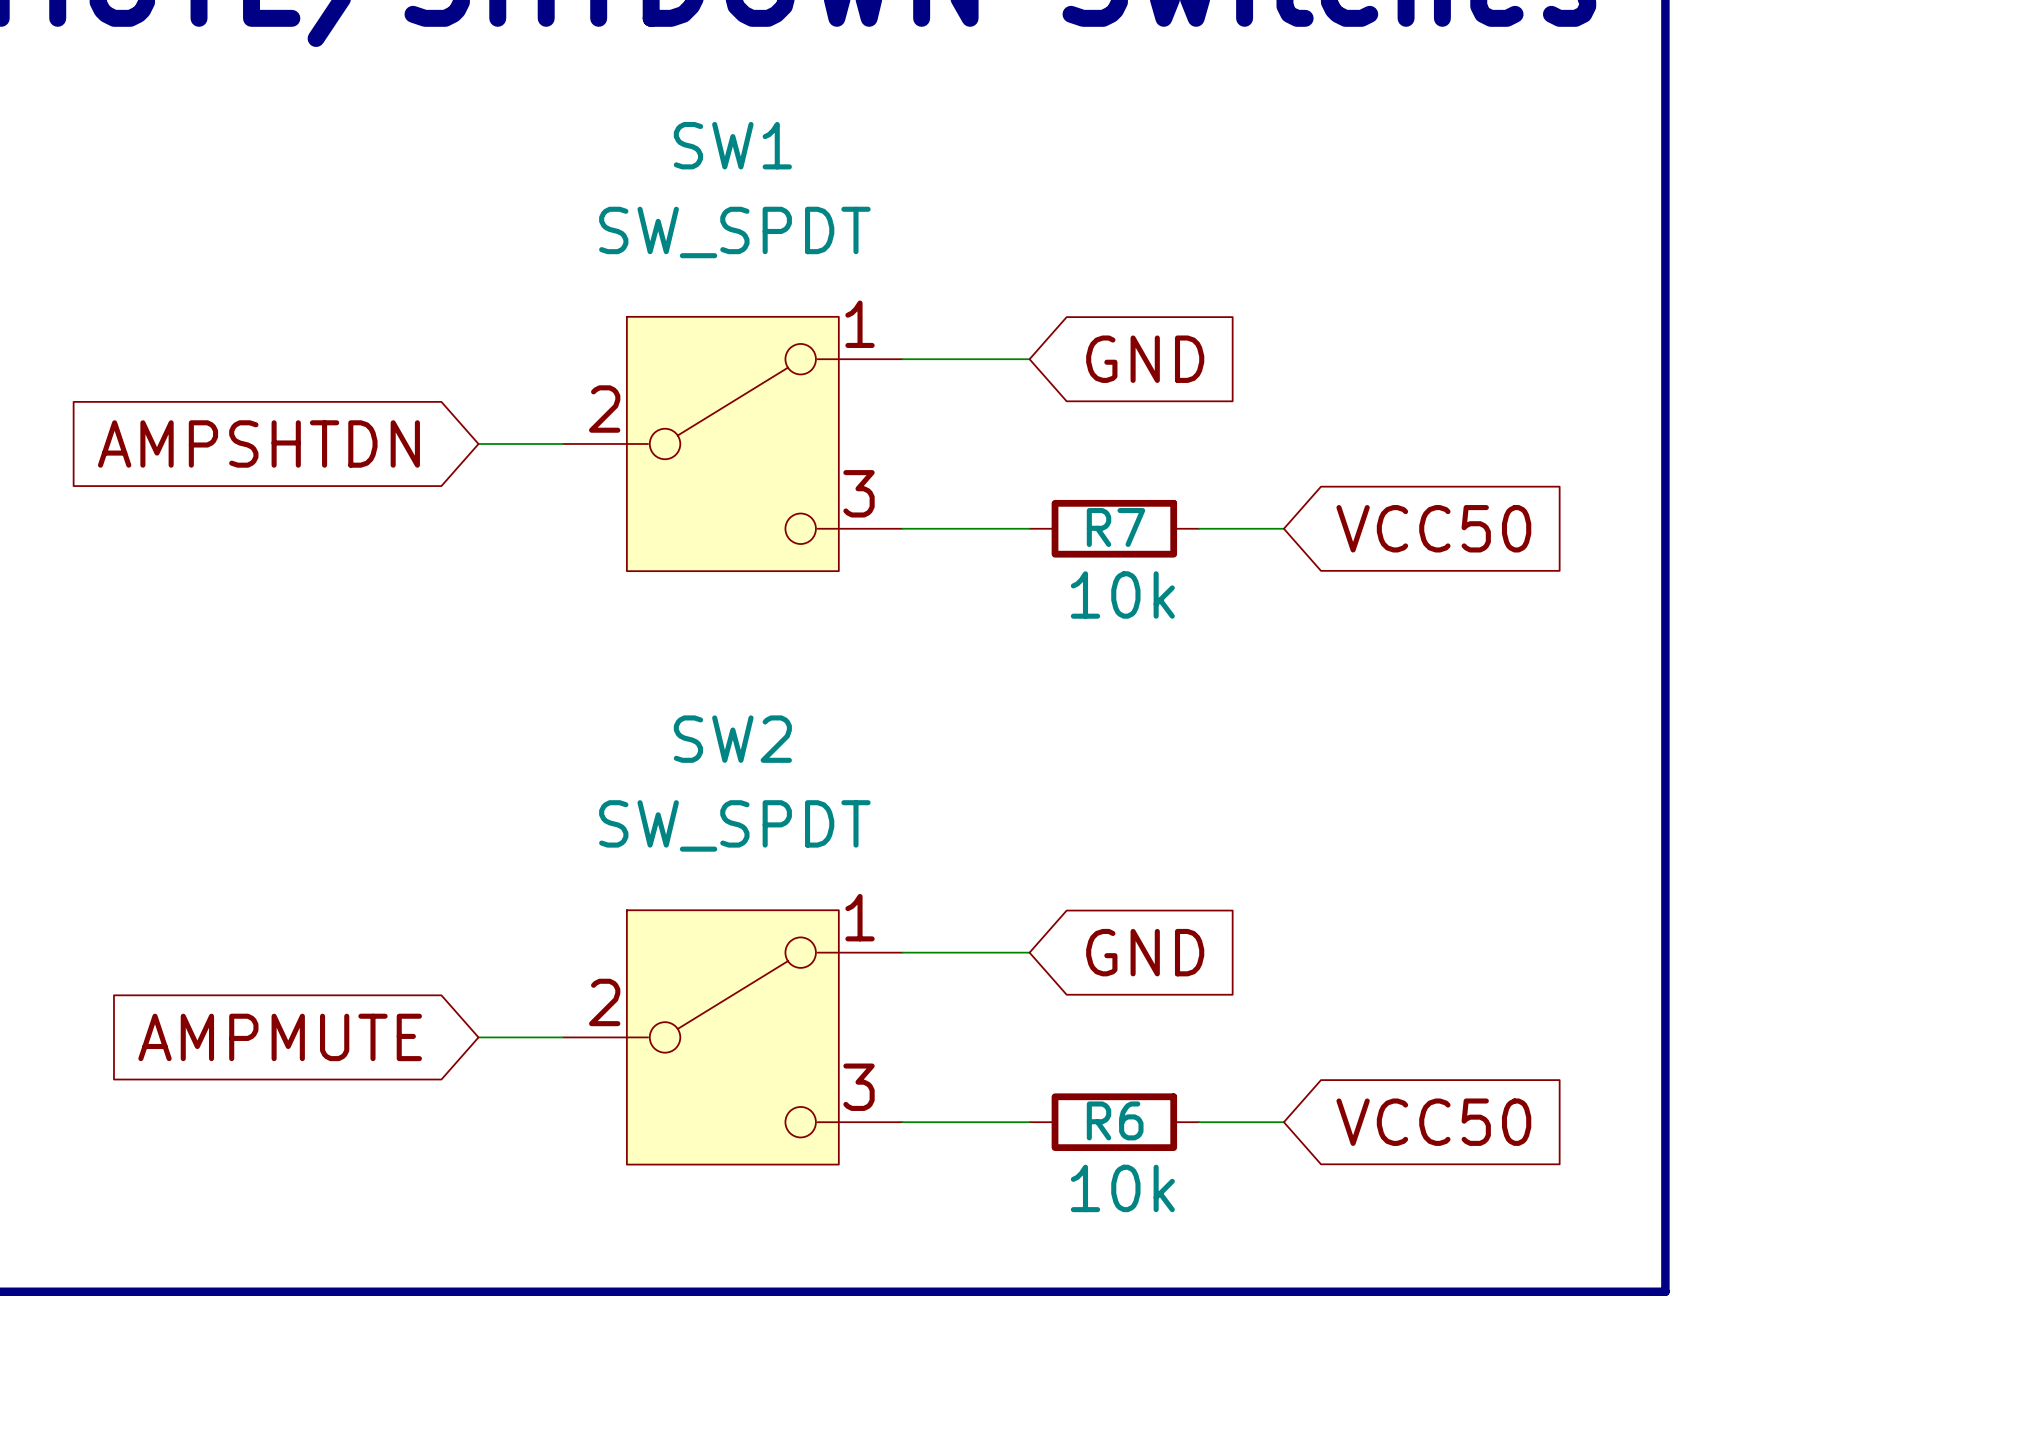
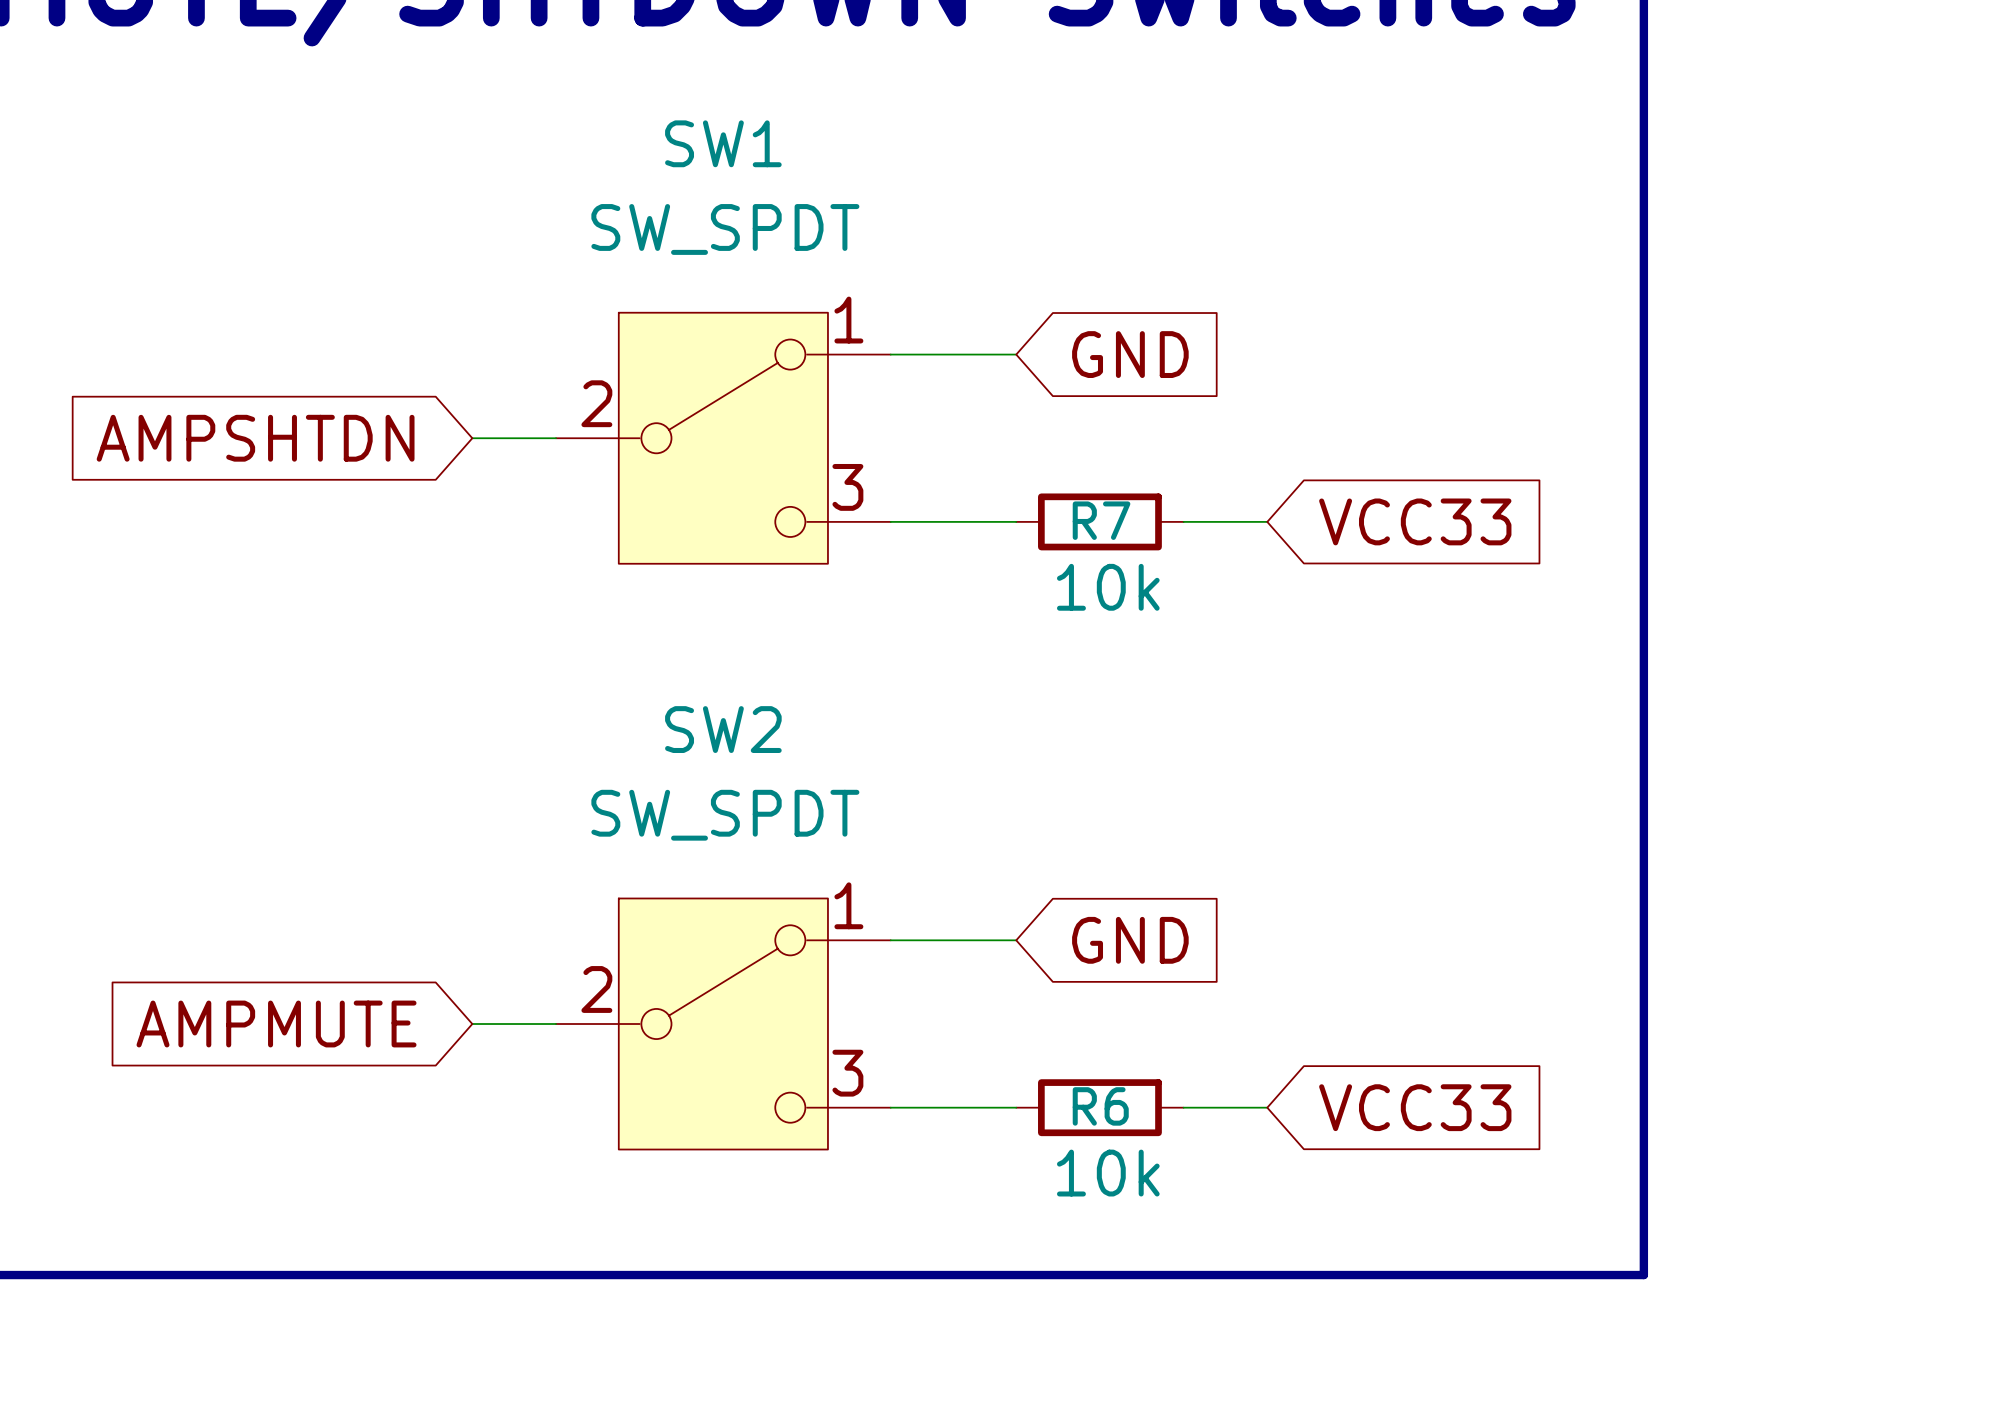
global label: VCC50 (1433, 528) -> VCC33 (1415, 521)
global label: VCC50 (1433, 1122) -> VCC33 (1415, 1107)

